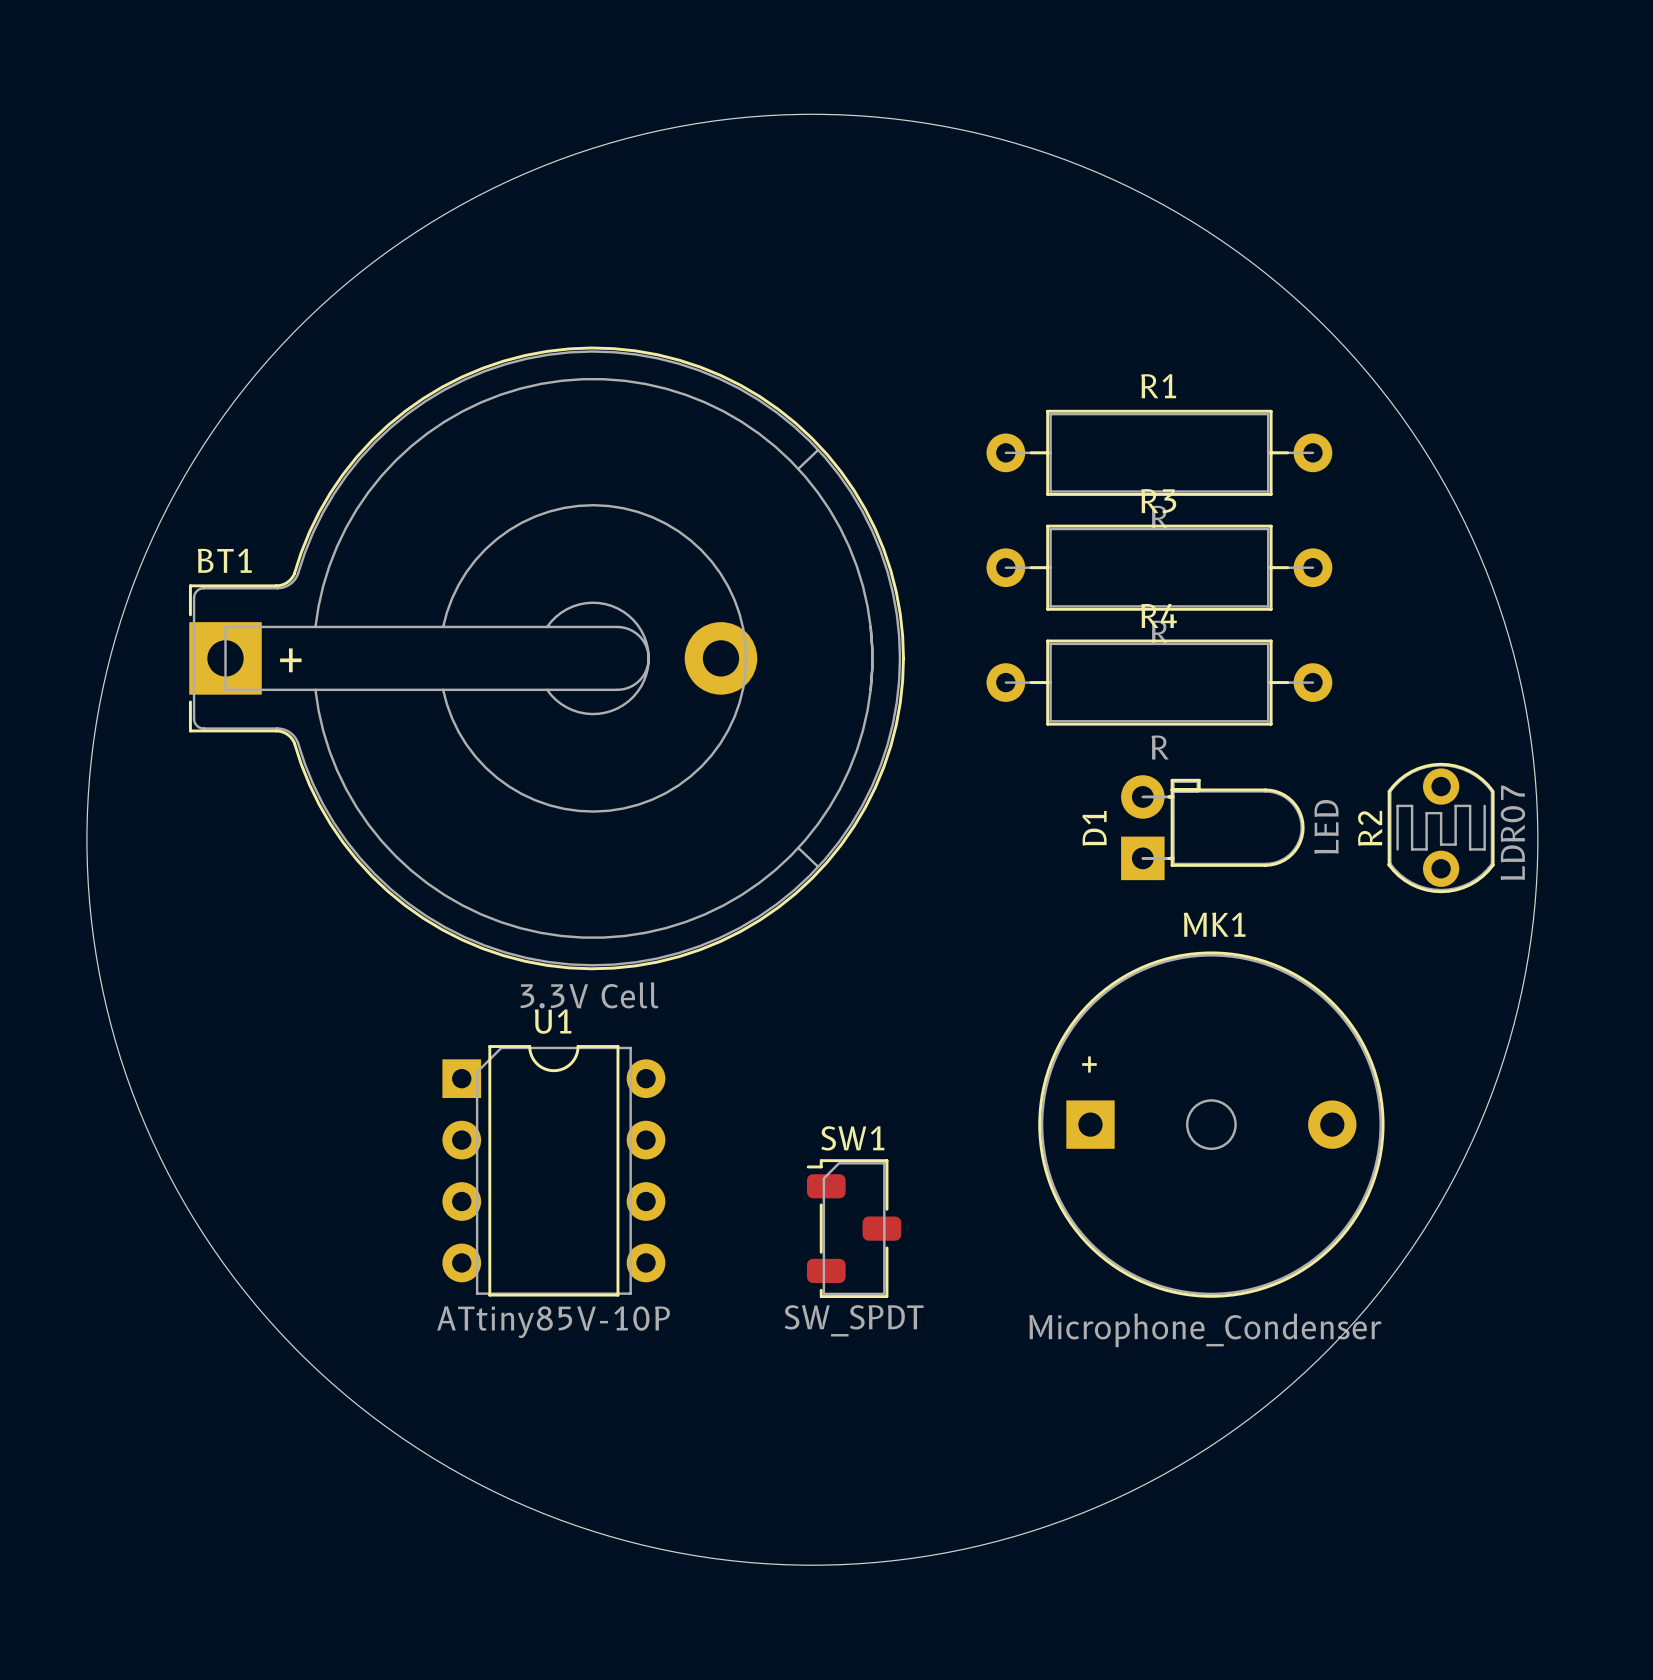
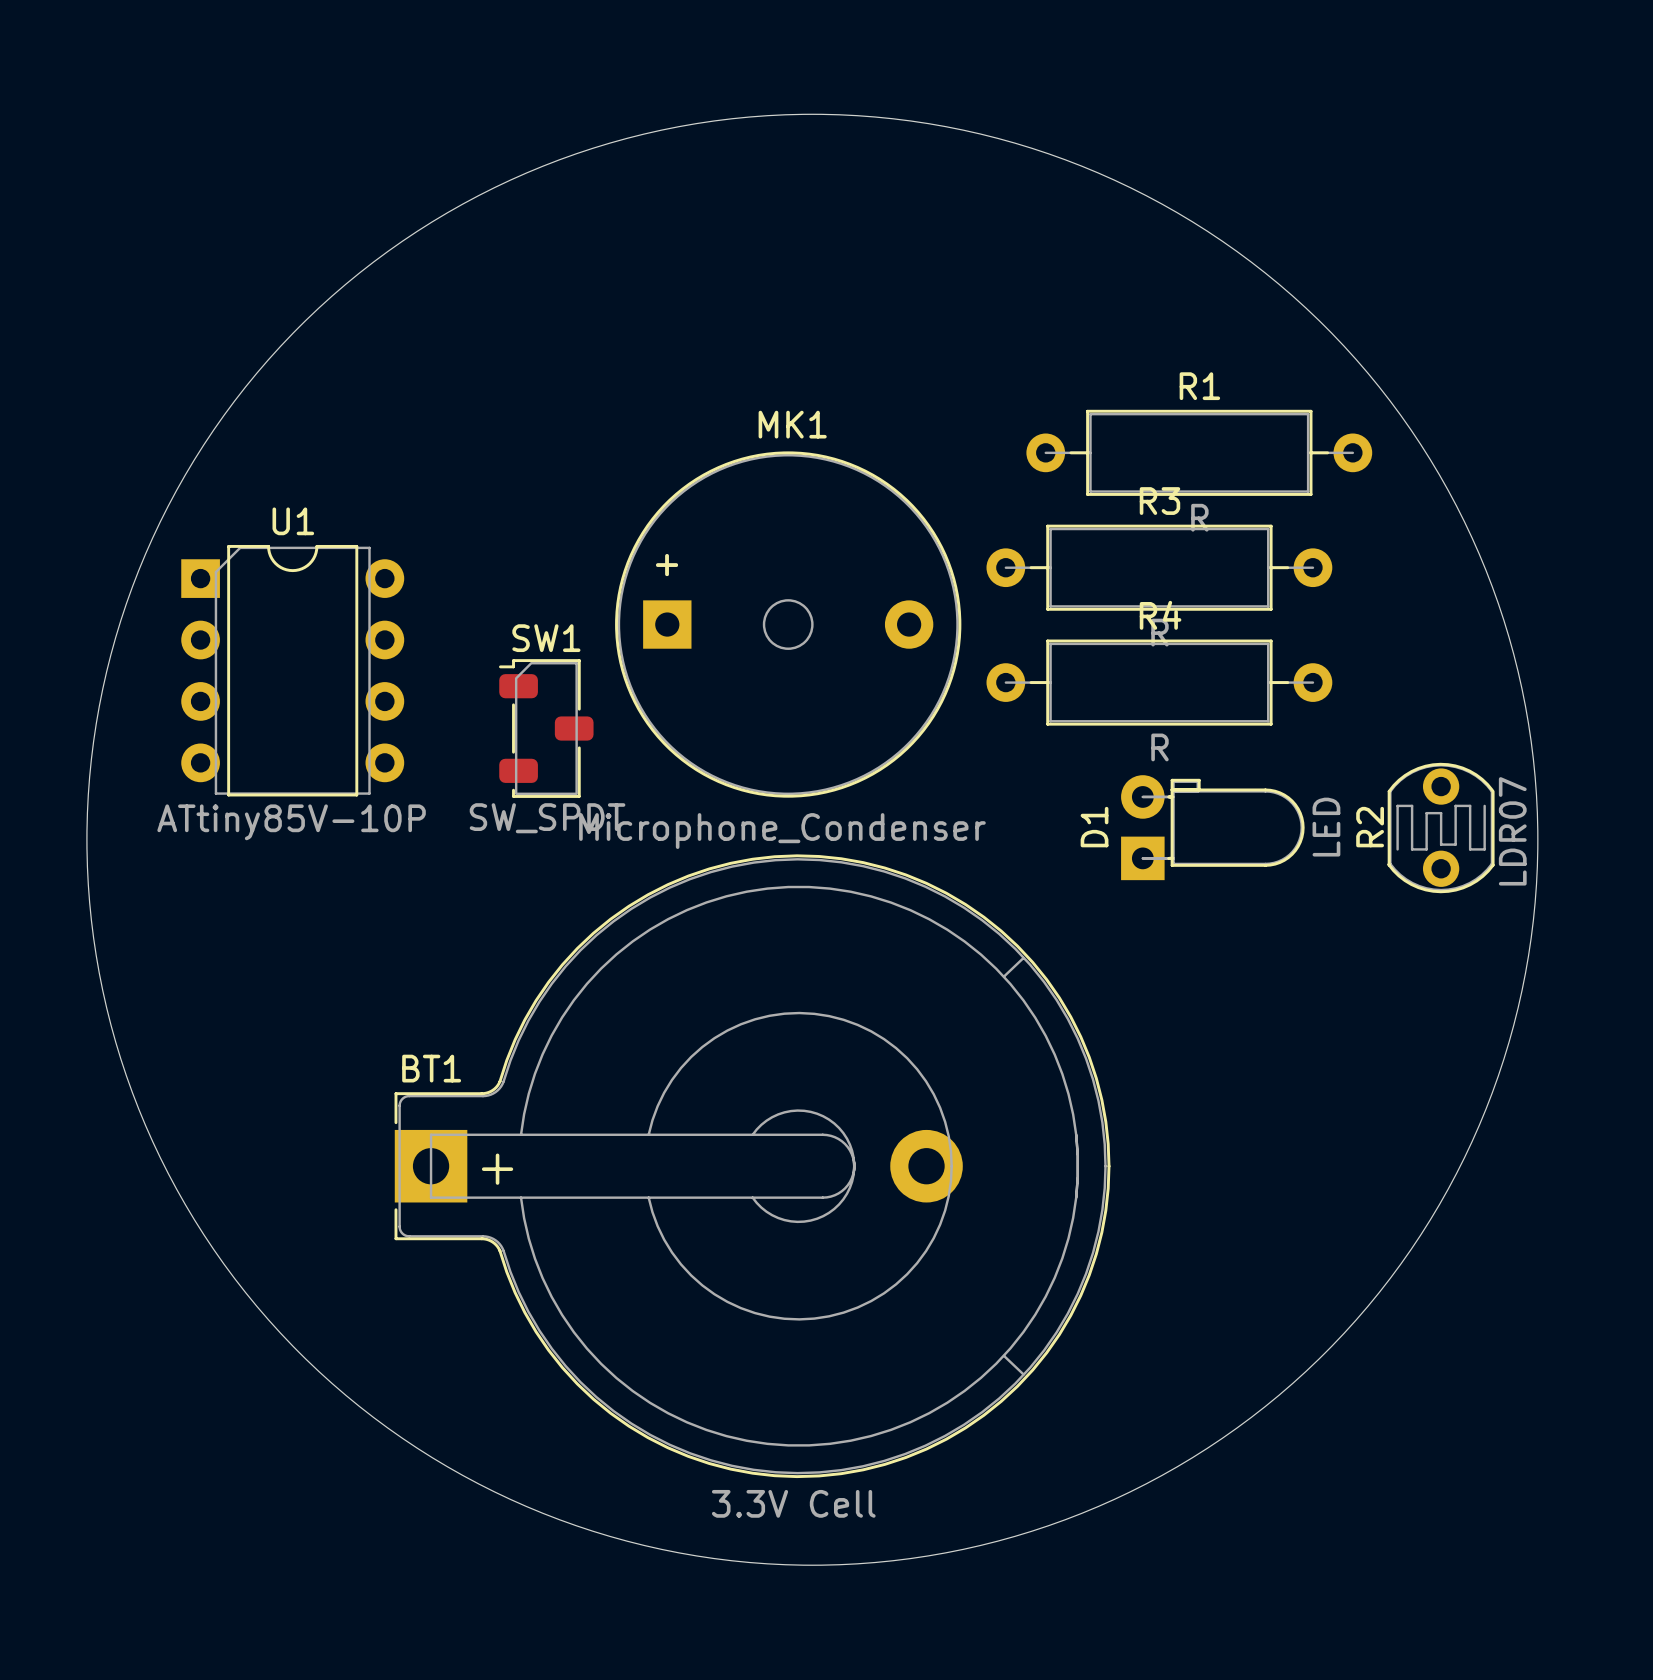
R1 position: (1159, 452) -> (1199, 452)
BT1 position: (546, 658) -> (752, 1166)
MK1 position: (1211, 1124) -> (788, 624)
U1 position: (553, 1170) -> (292, 670)
SW1 position: (853, 1228) -> (546, 728)

